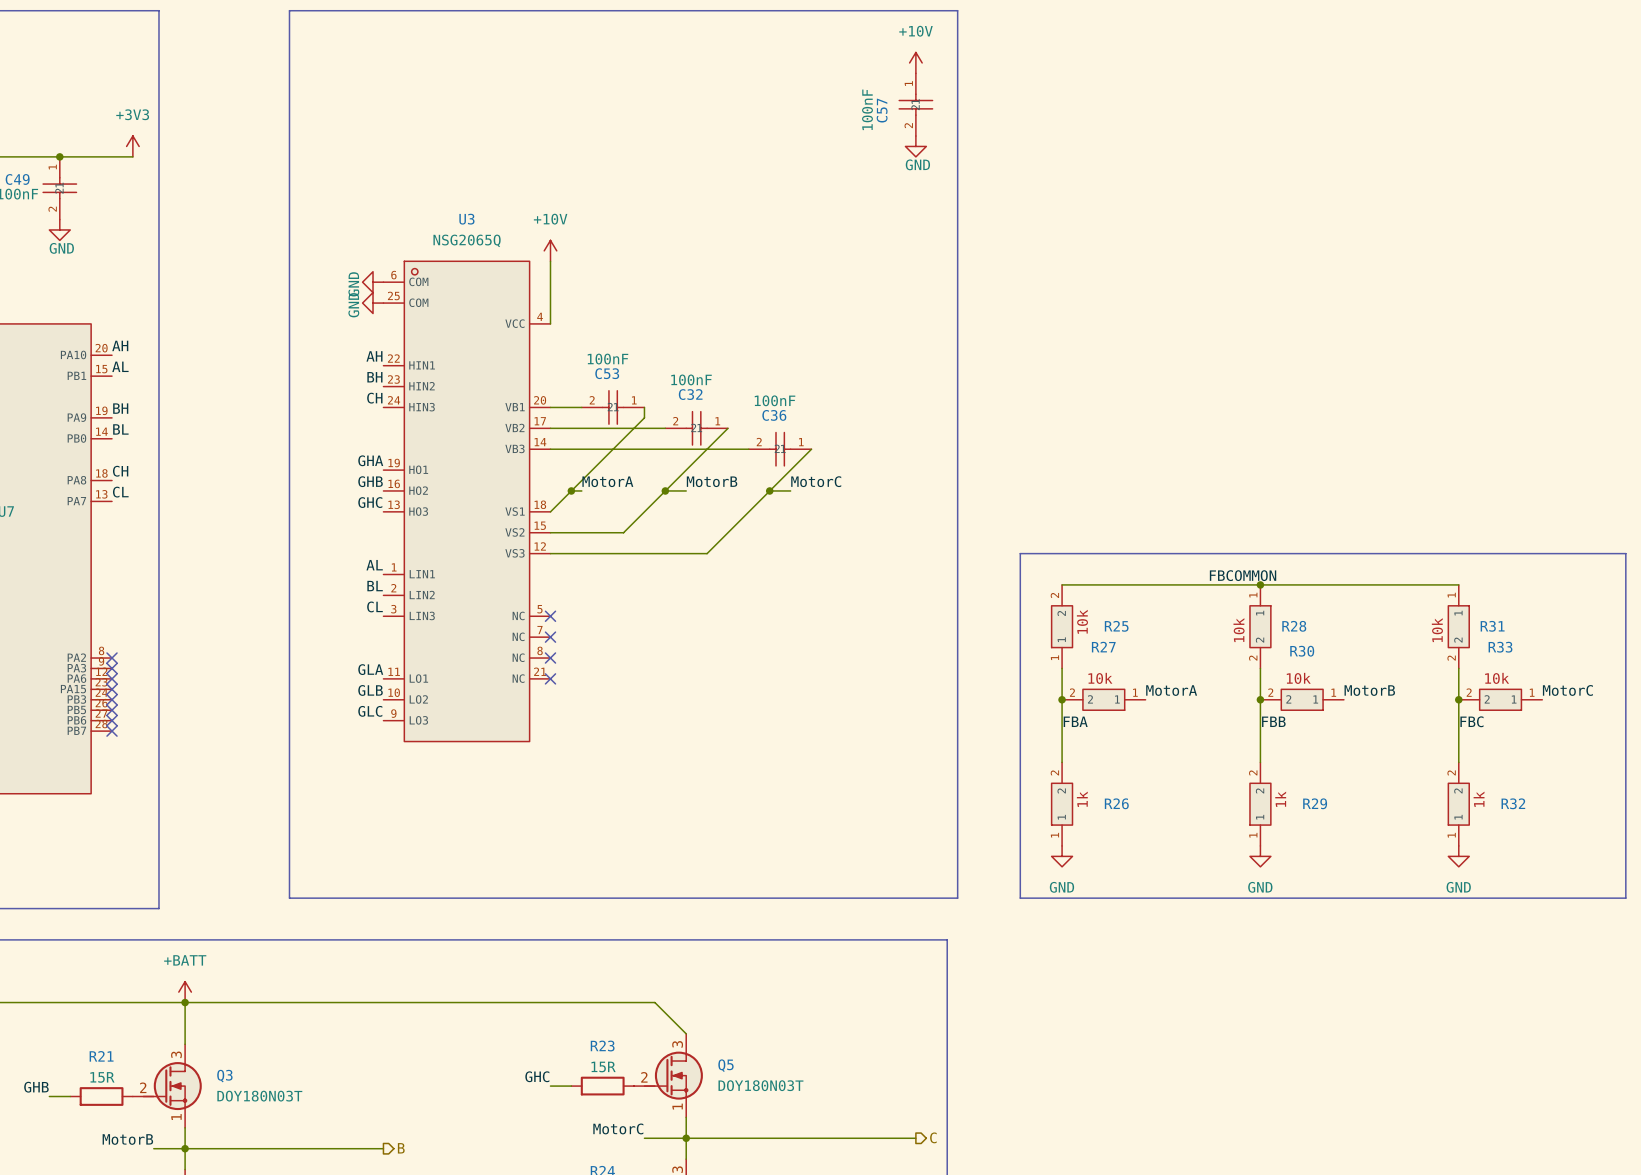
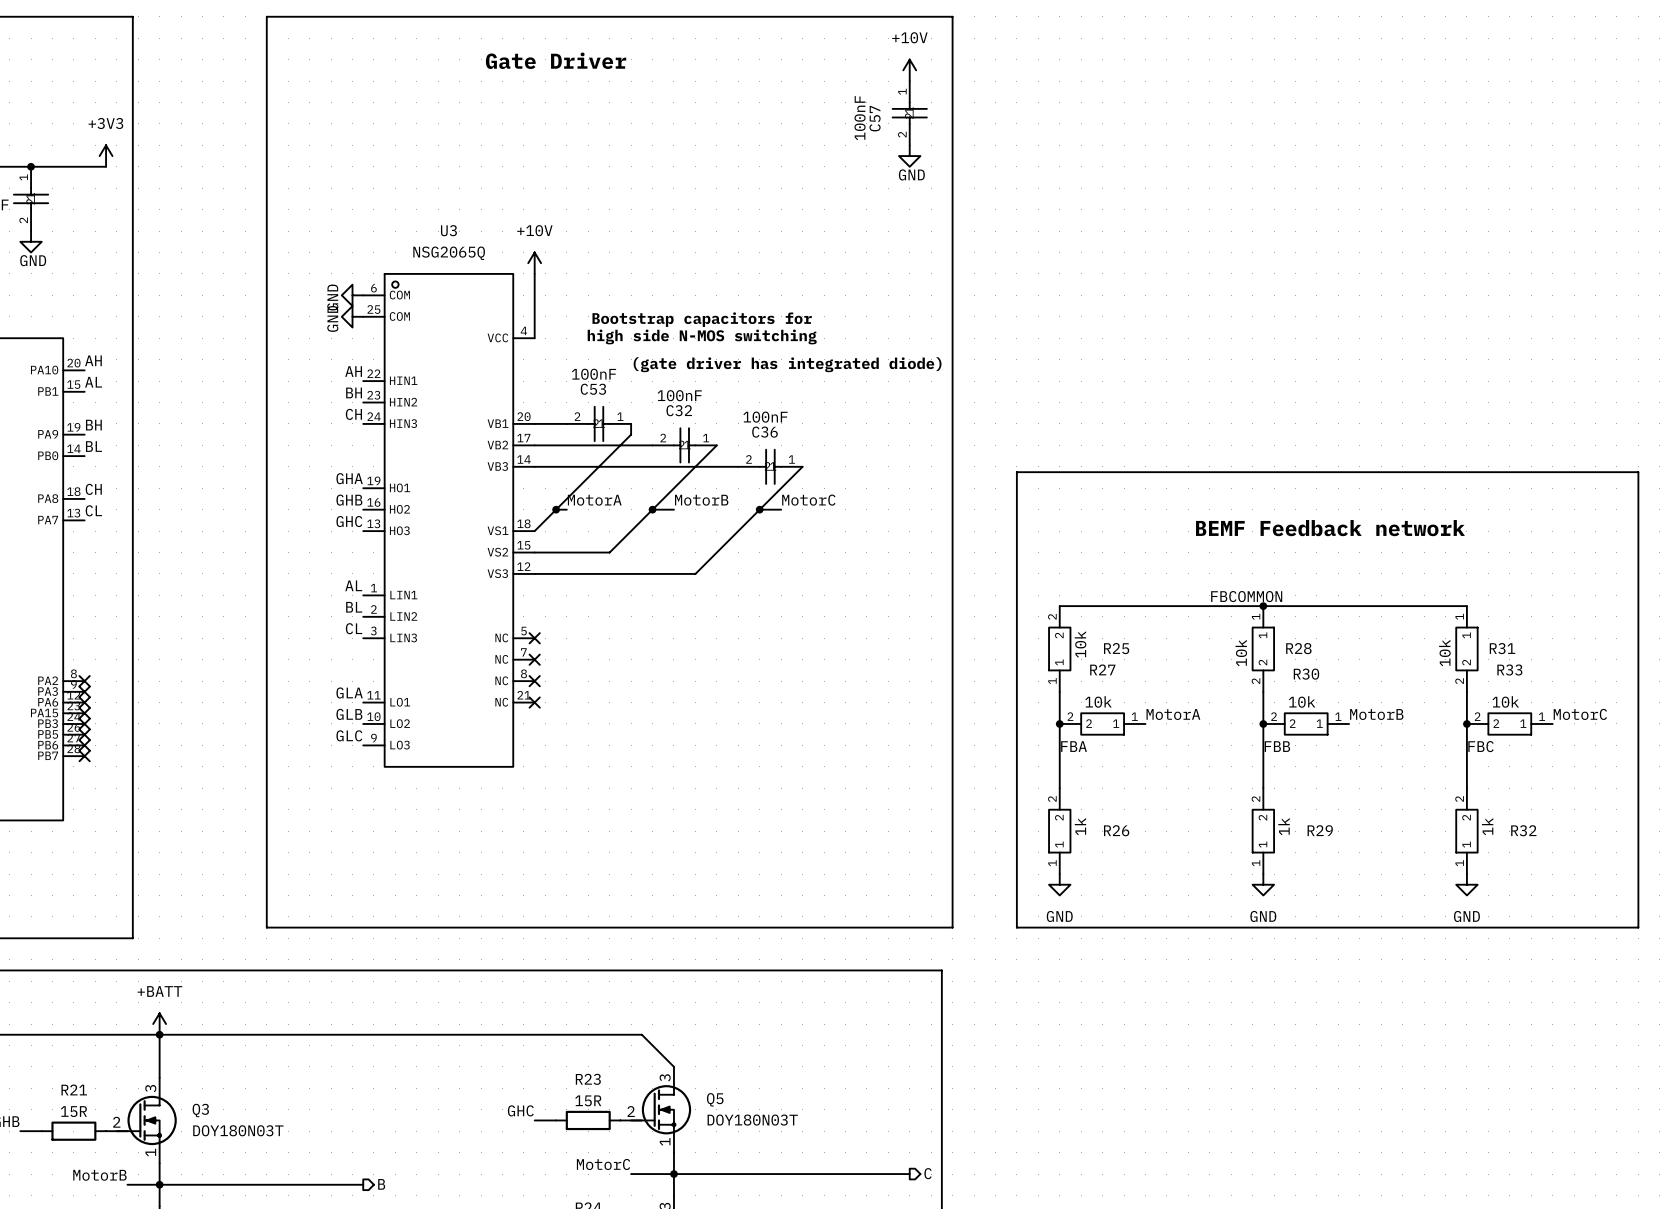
text: none -> Gate Driver (556, 60)
text: none -> Bootstrap capacitors for (702, 319)
text: none -> high side N-MOS switching (702, 336)
text: none -> (gate driver has integrated diode) (787, 364)
text: none -> BEMF Feedback network (1330, 528)
line: (1020, 553) (1625, 553) -> (1016, 573) (1016, 472) (1638, 472) (1638, 573)

